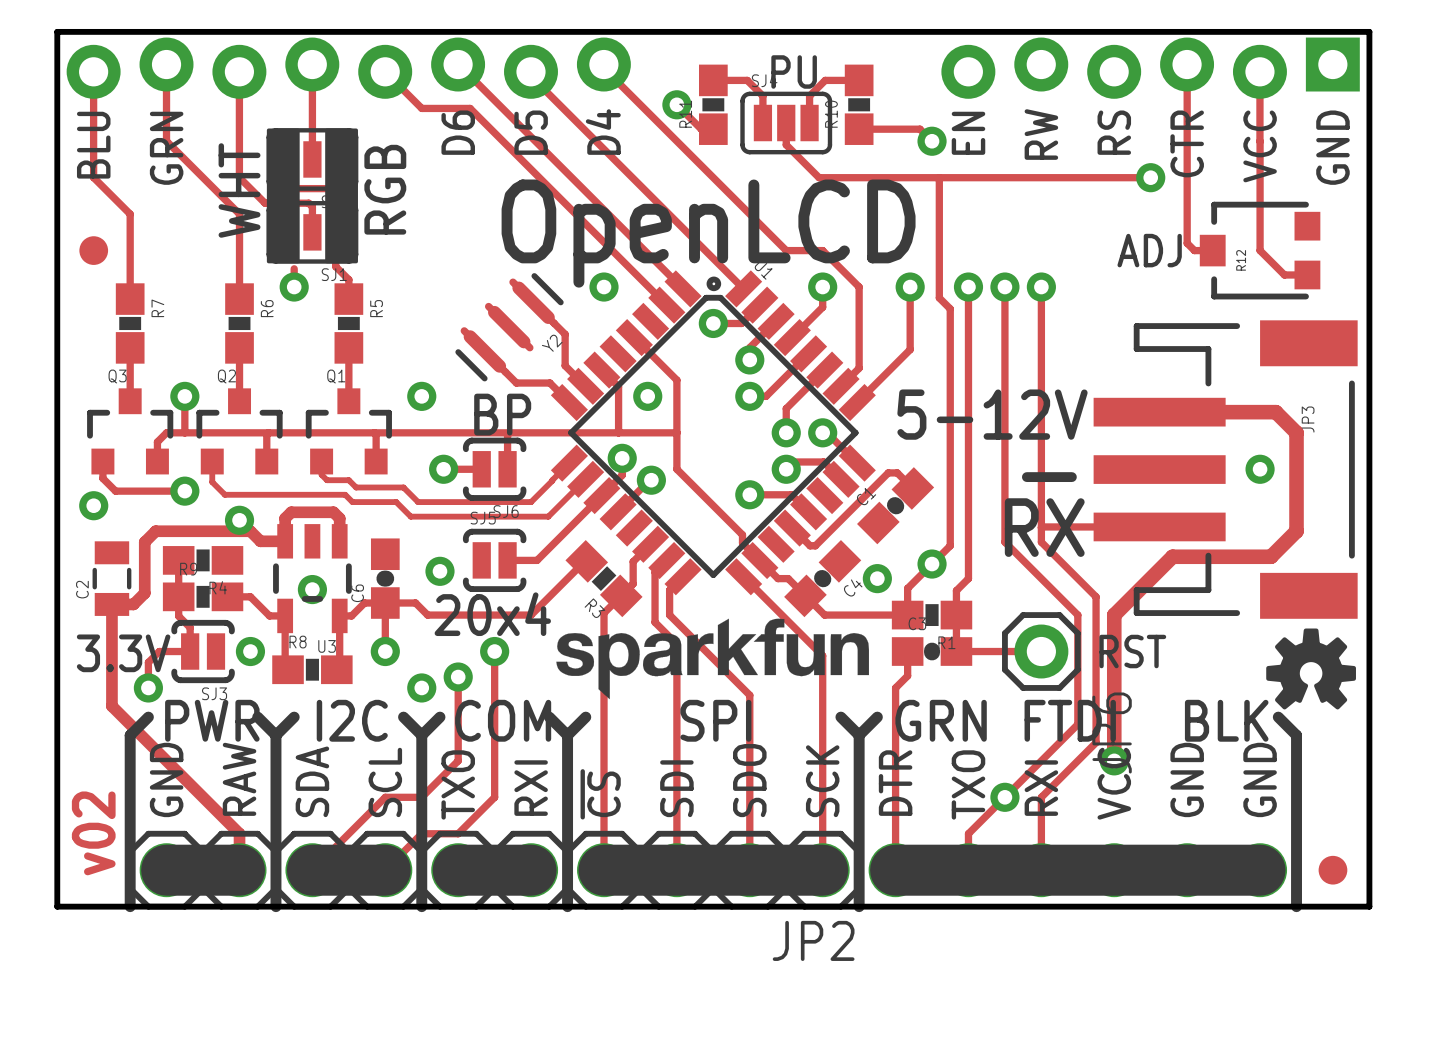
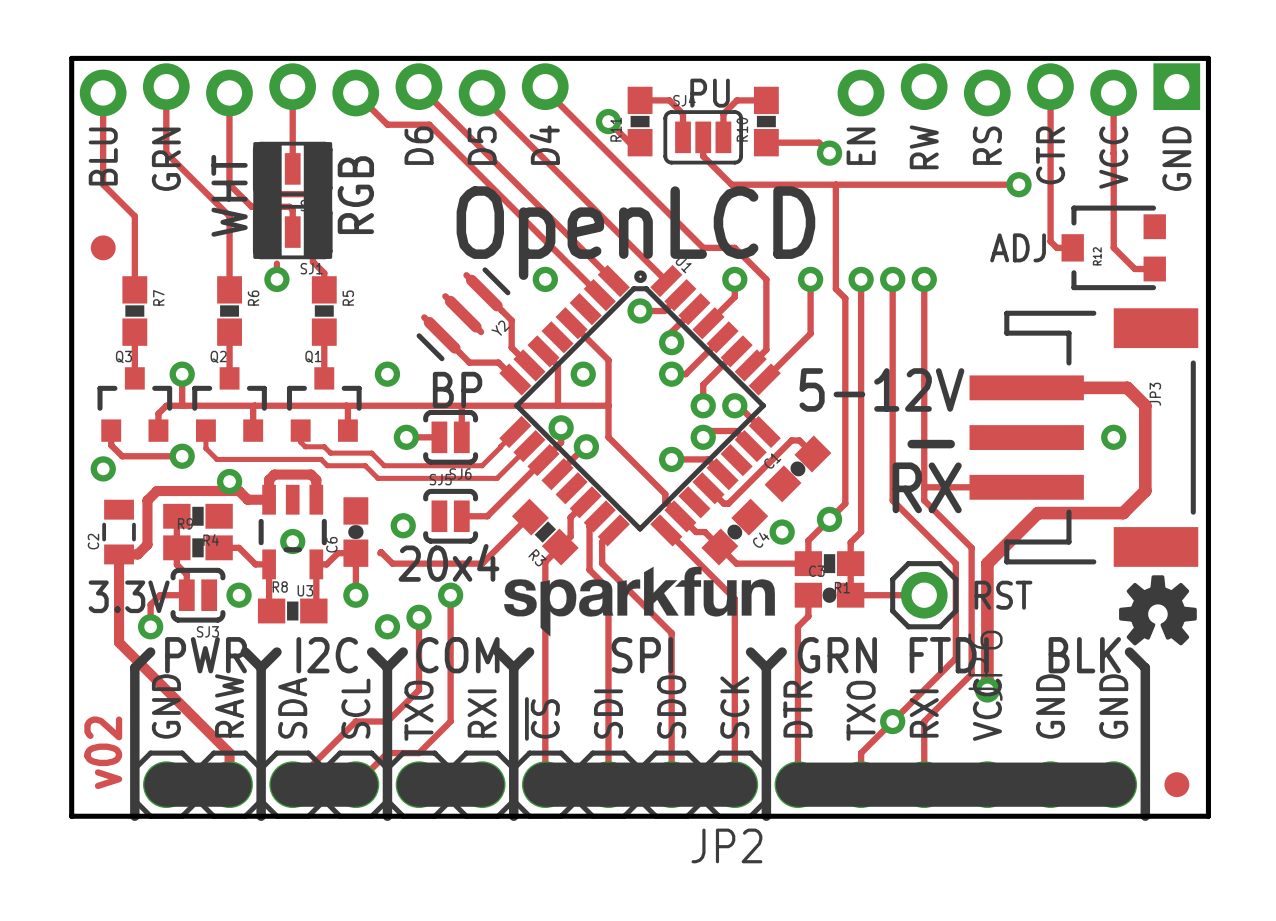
track: (385, 603) (415, 603) -> (380, 553) (382, 553)

